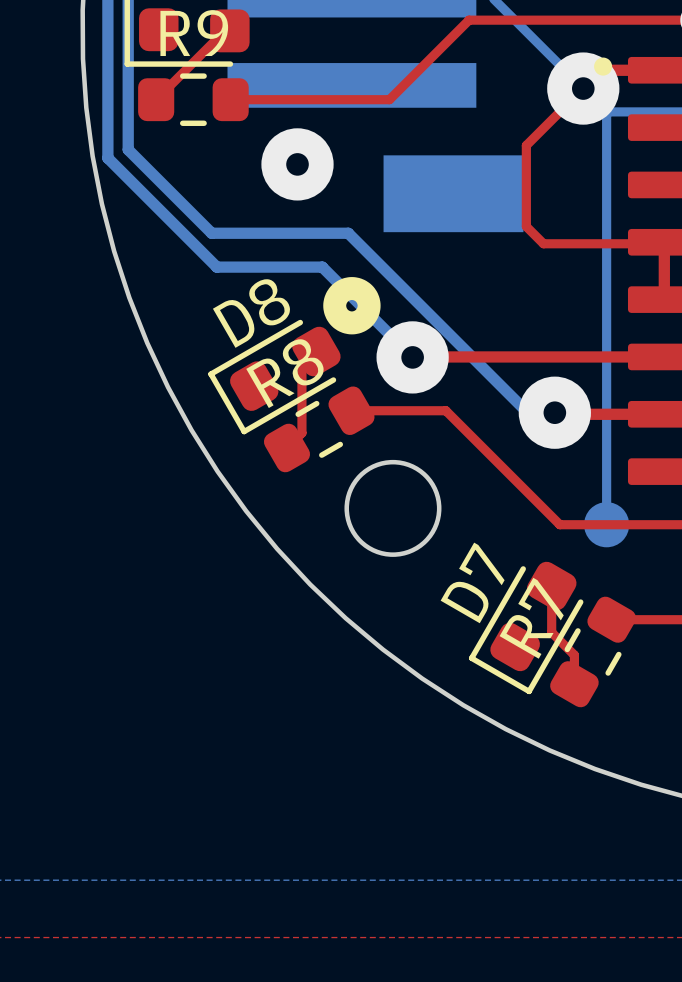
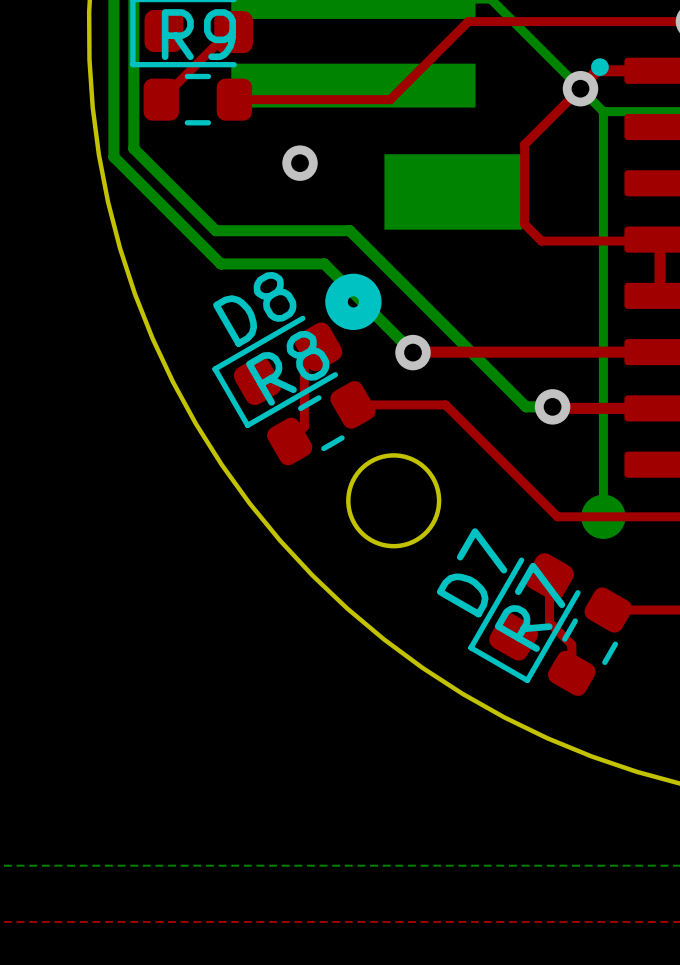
via size: [547, 52, 620, 125] -> [562, 70, 599, 107]
via size: [261, 128, 334, 201] -> [282, 145, 318, 181]
via size: [376, 321, 449, 394] -> [395, 334, 431, 371]
via size: [518, 376, 591, 449] -> [534, 389, 571, 425]

